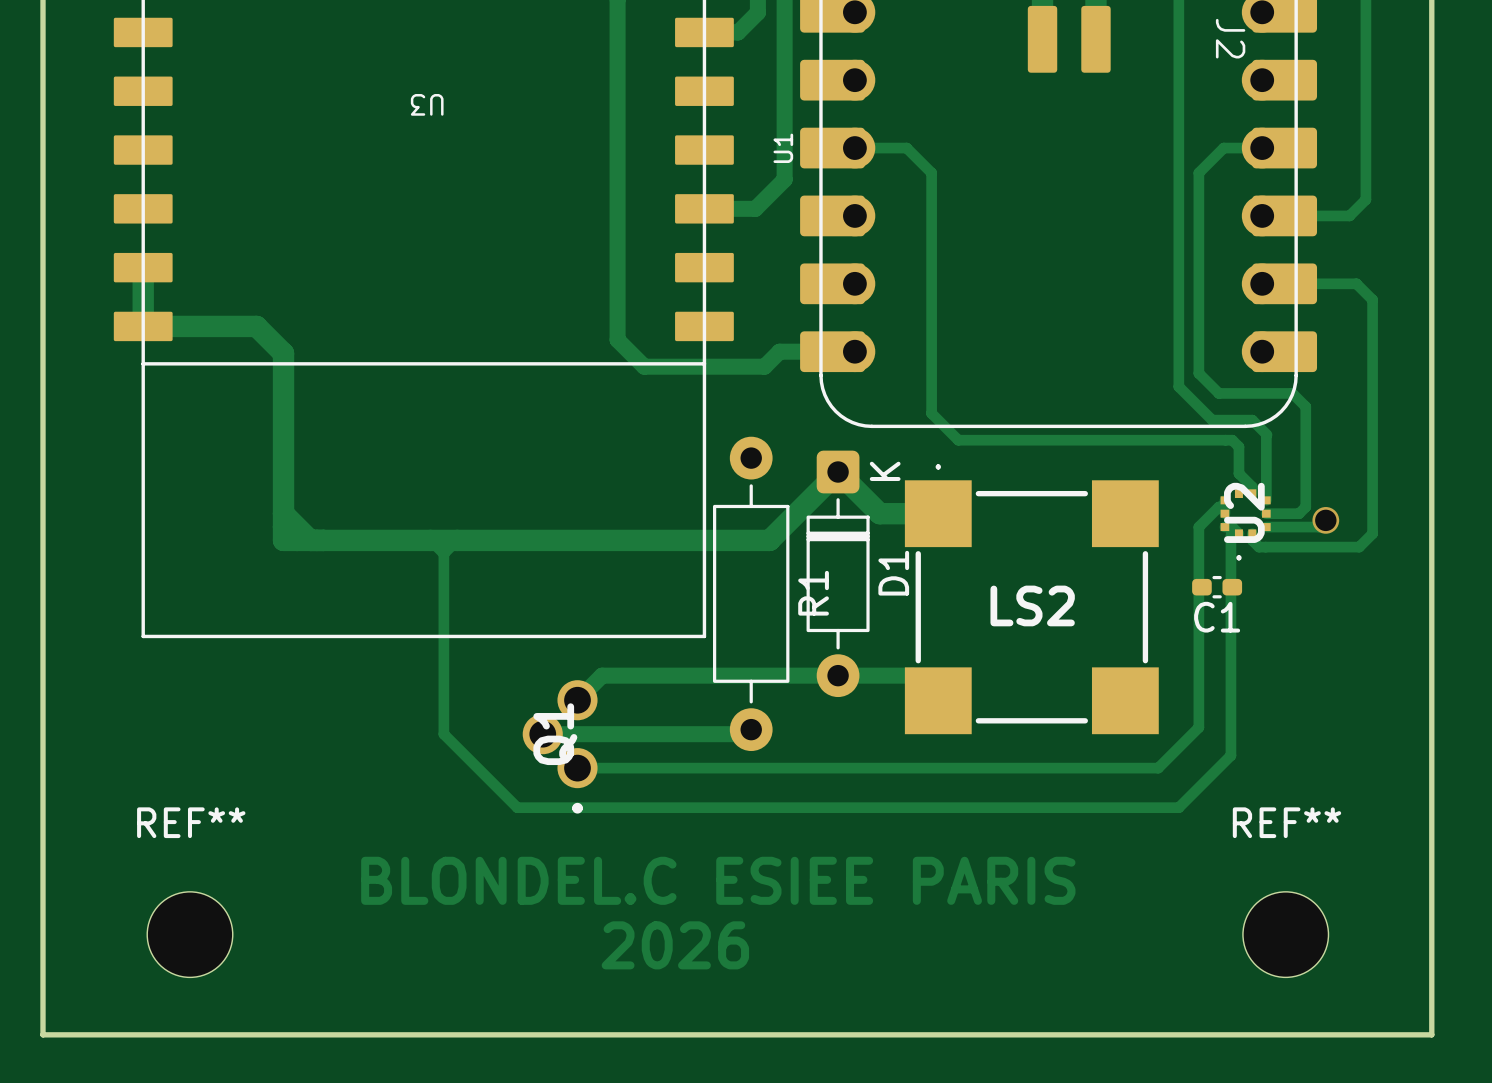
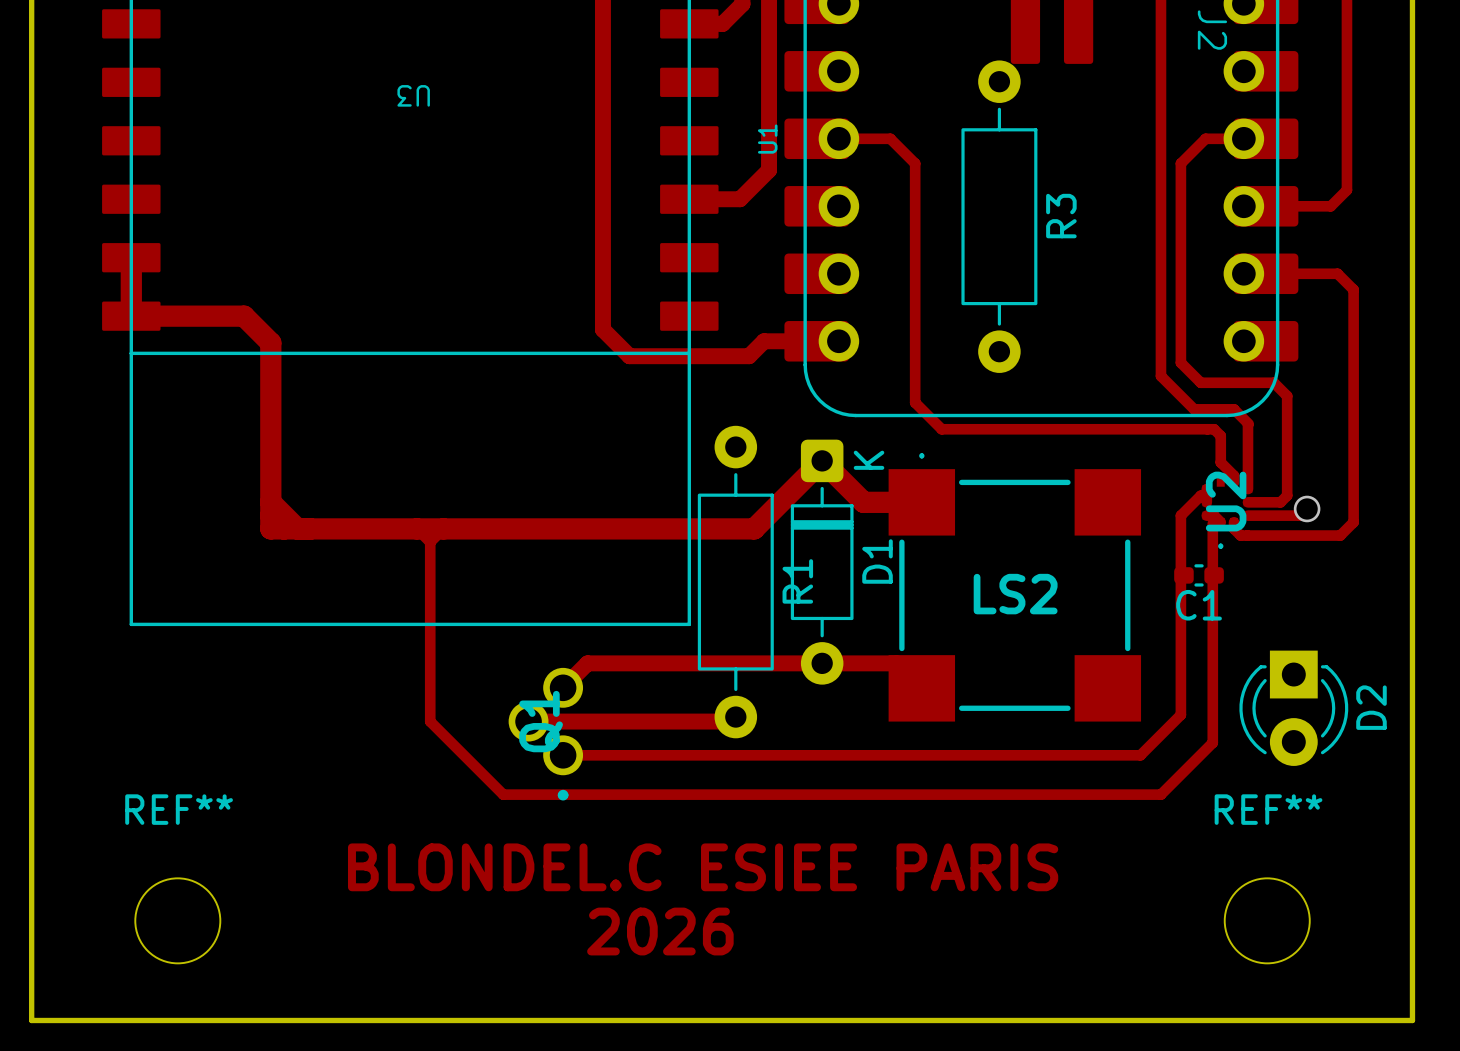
R3: none -> (999, 216)
D2: none -> (1293, 708)

